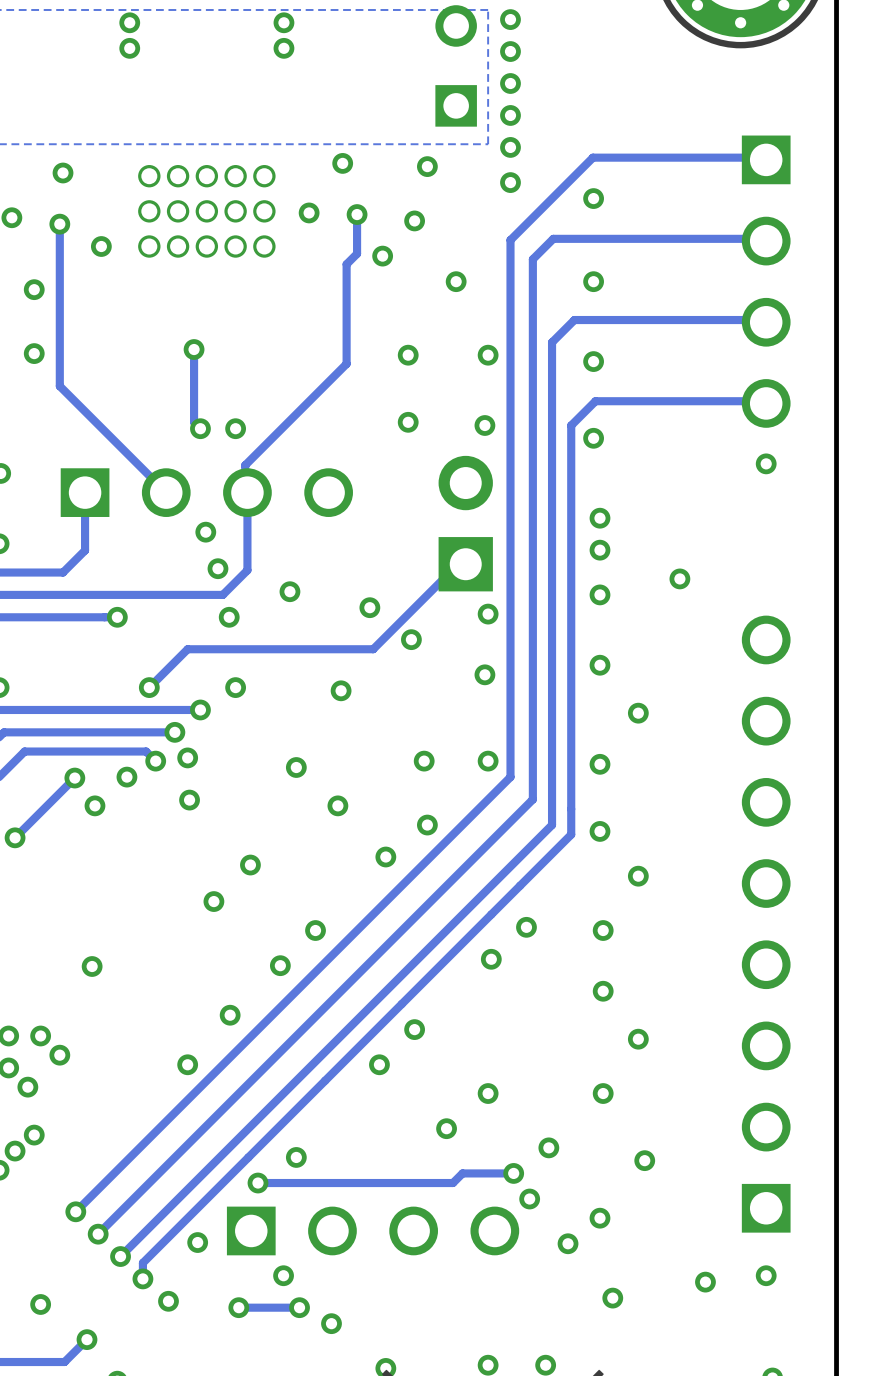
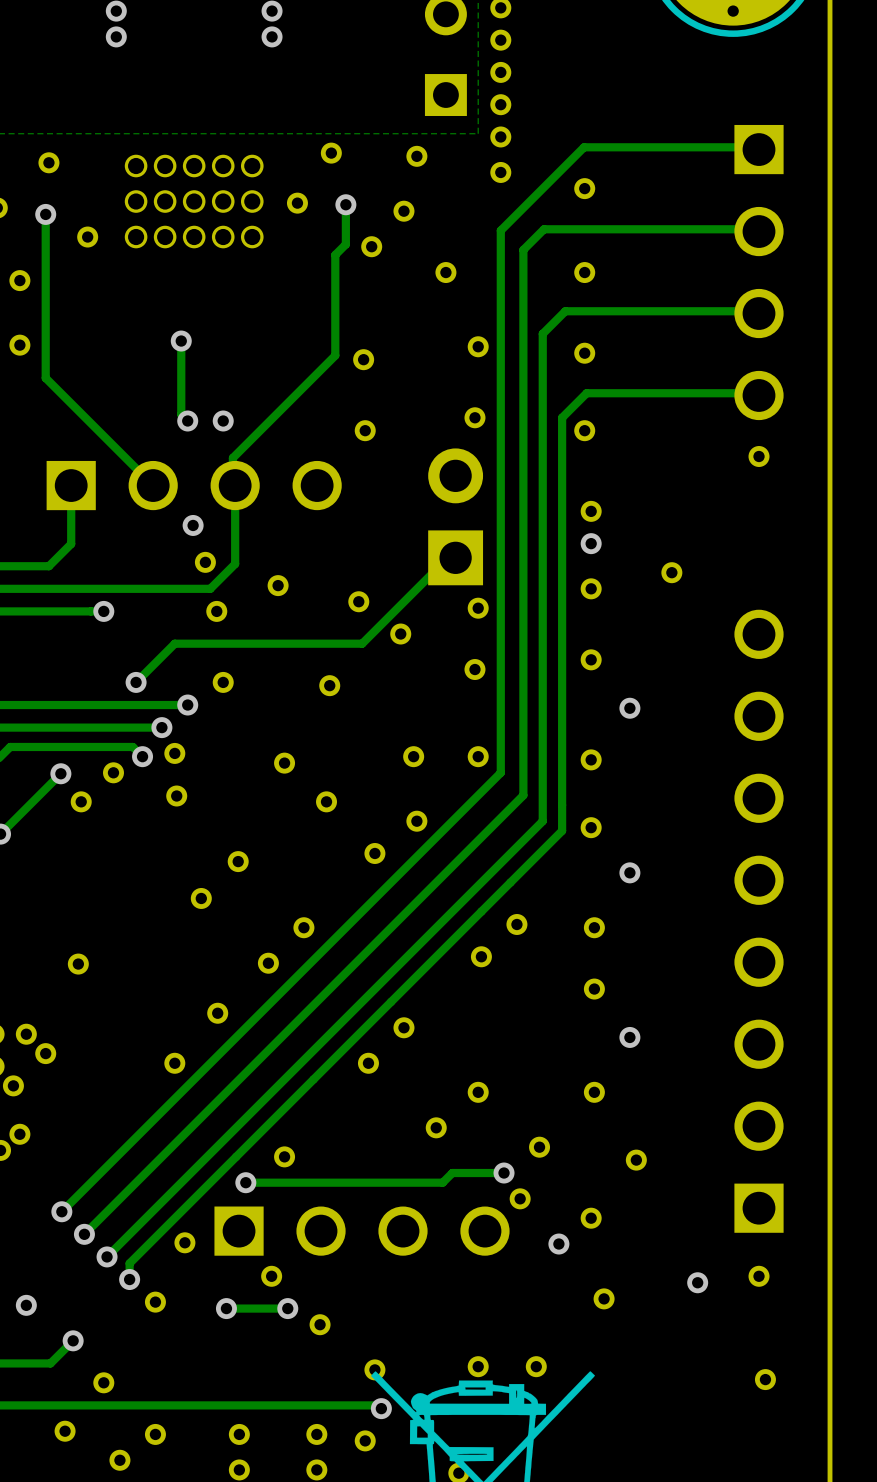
part: (408, 355) -> none
part: none -> (363, 359)
part: (408, 422) -> none
part: none -> (365, 430)

